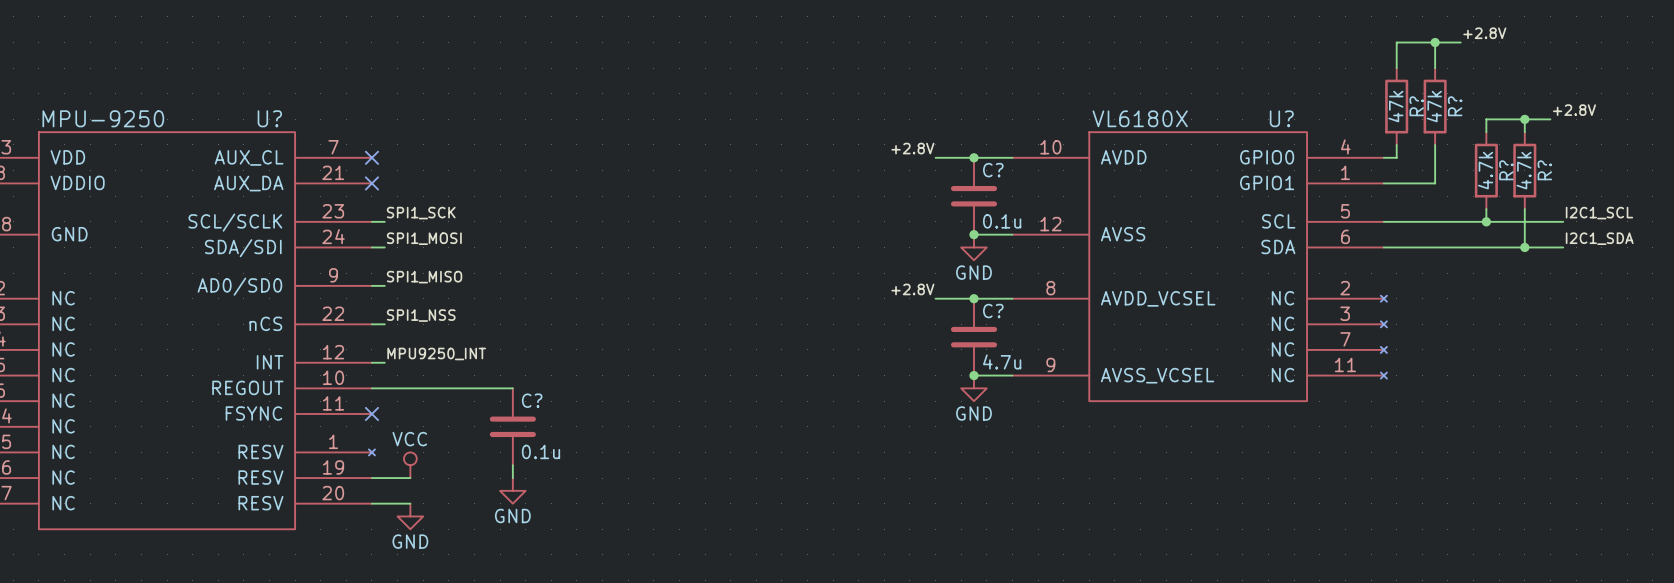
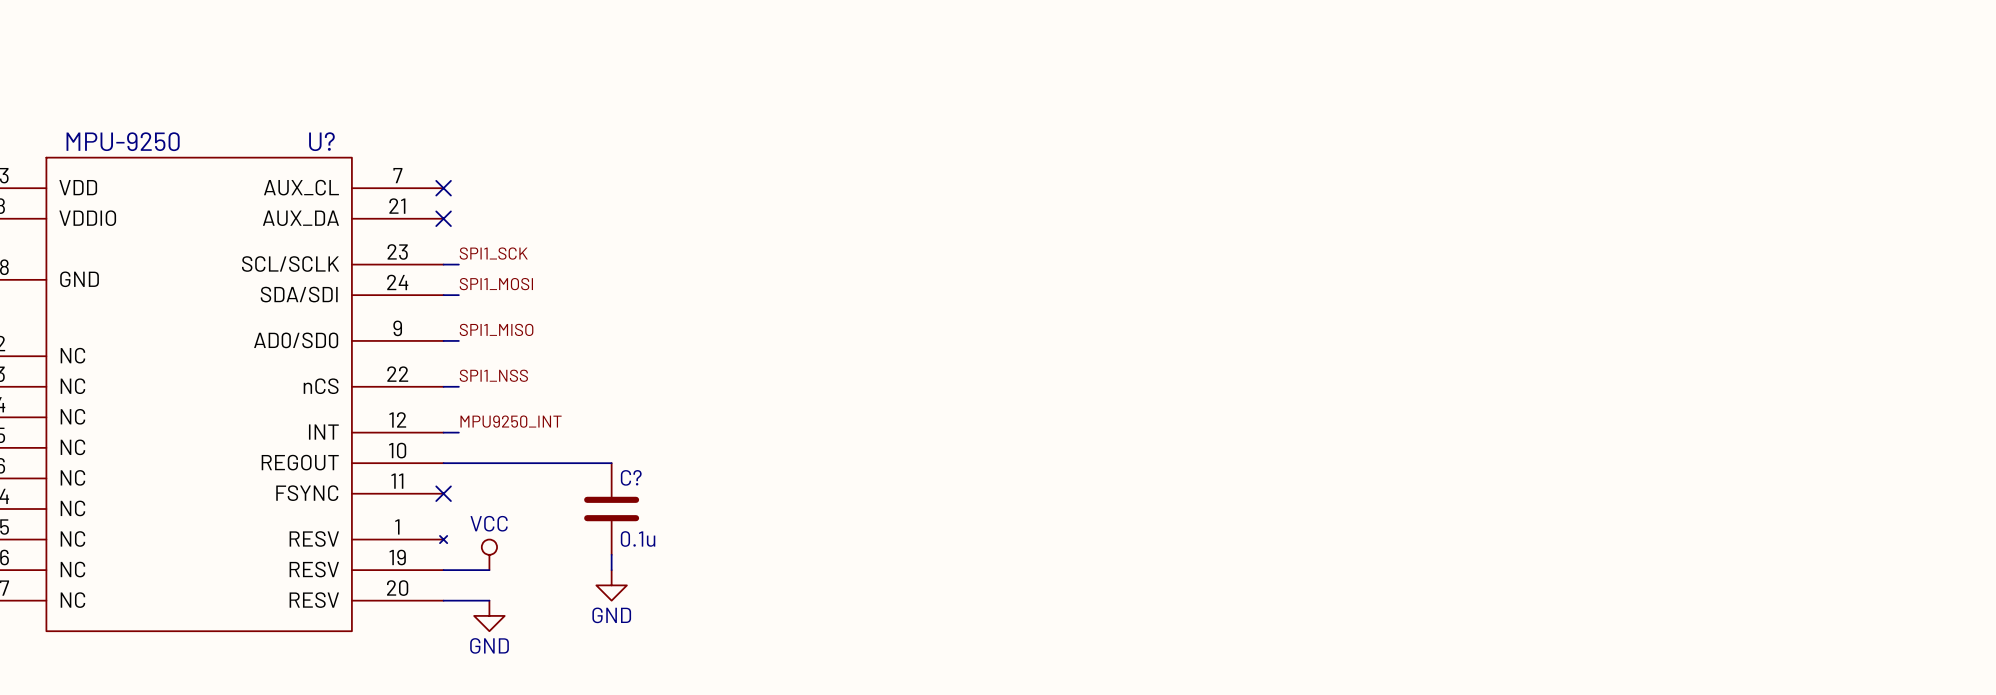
label: +2.8V (1484, 33) -> none
wire: (1435, 42) (1435, 68) -> none
junction: (1435, 42) -> none
wire: (1460, 42) (1396, 42) (1396, 68) -> none
R?: 47k (1396, 106) -> none
R?: 47k (1435, 106) -> none
label: +2.8V (1574, 110) -> none
wire: (1524, 119) (1524, 132) -> none
junction: (1524, 119) -> none
wire: (1550, 119) (1486, 119) (1486, 132) -> none
wire: (1396, 144) (1396, 157) (1383, 157) -> none
wire: (1435, 144) (1435, 183) (1383, 183) -> none
label: +2.8V (912, 148) -> none
wire: (935, 157) (1012, 157) -> none
junction: (973, 157) -> none
R?: 4.7k (1486, 170) -> none
R?: 4.7k (1524, 170) -> none
C?: 0.1u (973, 196) -> none
wire: (1486, 209) (1486, 221) -> none
wire: (1524, 209) (1524, 247) -> none
label: I2C1_SCL (1599, 213) -> none
wire: (1383, 221) (1563, 221) -> none
junction: (1486, 221) -> none
wire: (973, 234) (1012, 234) -> none
junction: (973, 234) -> none
label: I2C1_SDA (1599, 238) -> none
power symbol: GND (973, 247) -> none
wire: (1383, 247) (1563, 247) -> none
junction: (1524, 247) -> none
U?: VL6180X (1199, 266) -> none
label: +2.8V (912, 289) -> none
wire: (935, 298) (1012, 298) -> none
junction: (973, 298) -> none
C?: 4.7u (973, 337) -> none
wire: (973, 375) (1012, 375) -> none
junction: (973, 375) -> none
power symbol: GND (973, 388) -> none

